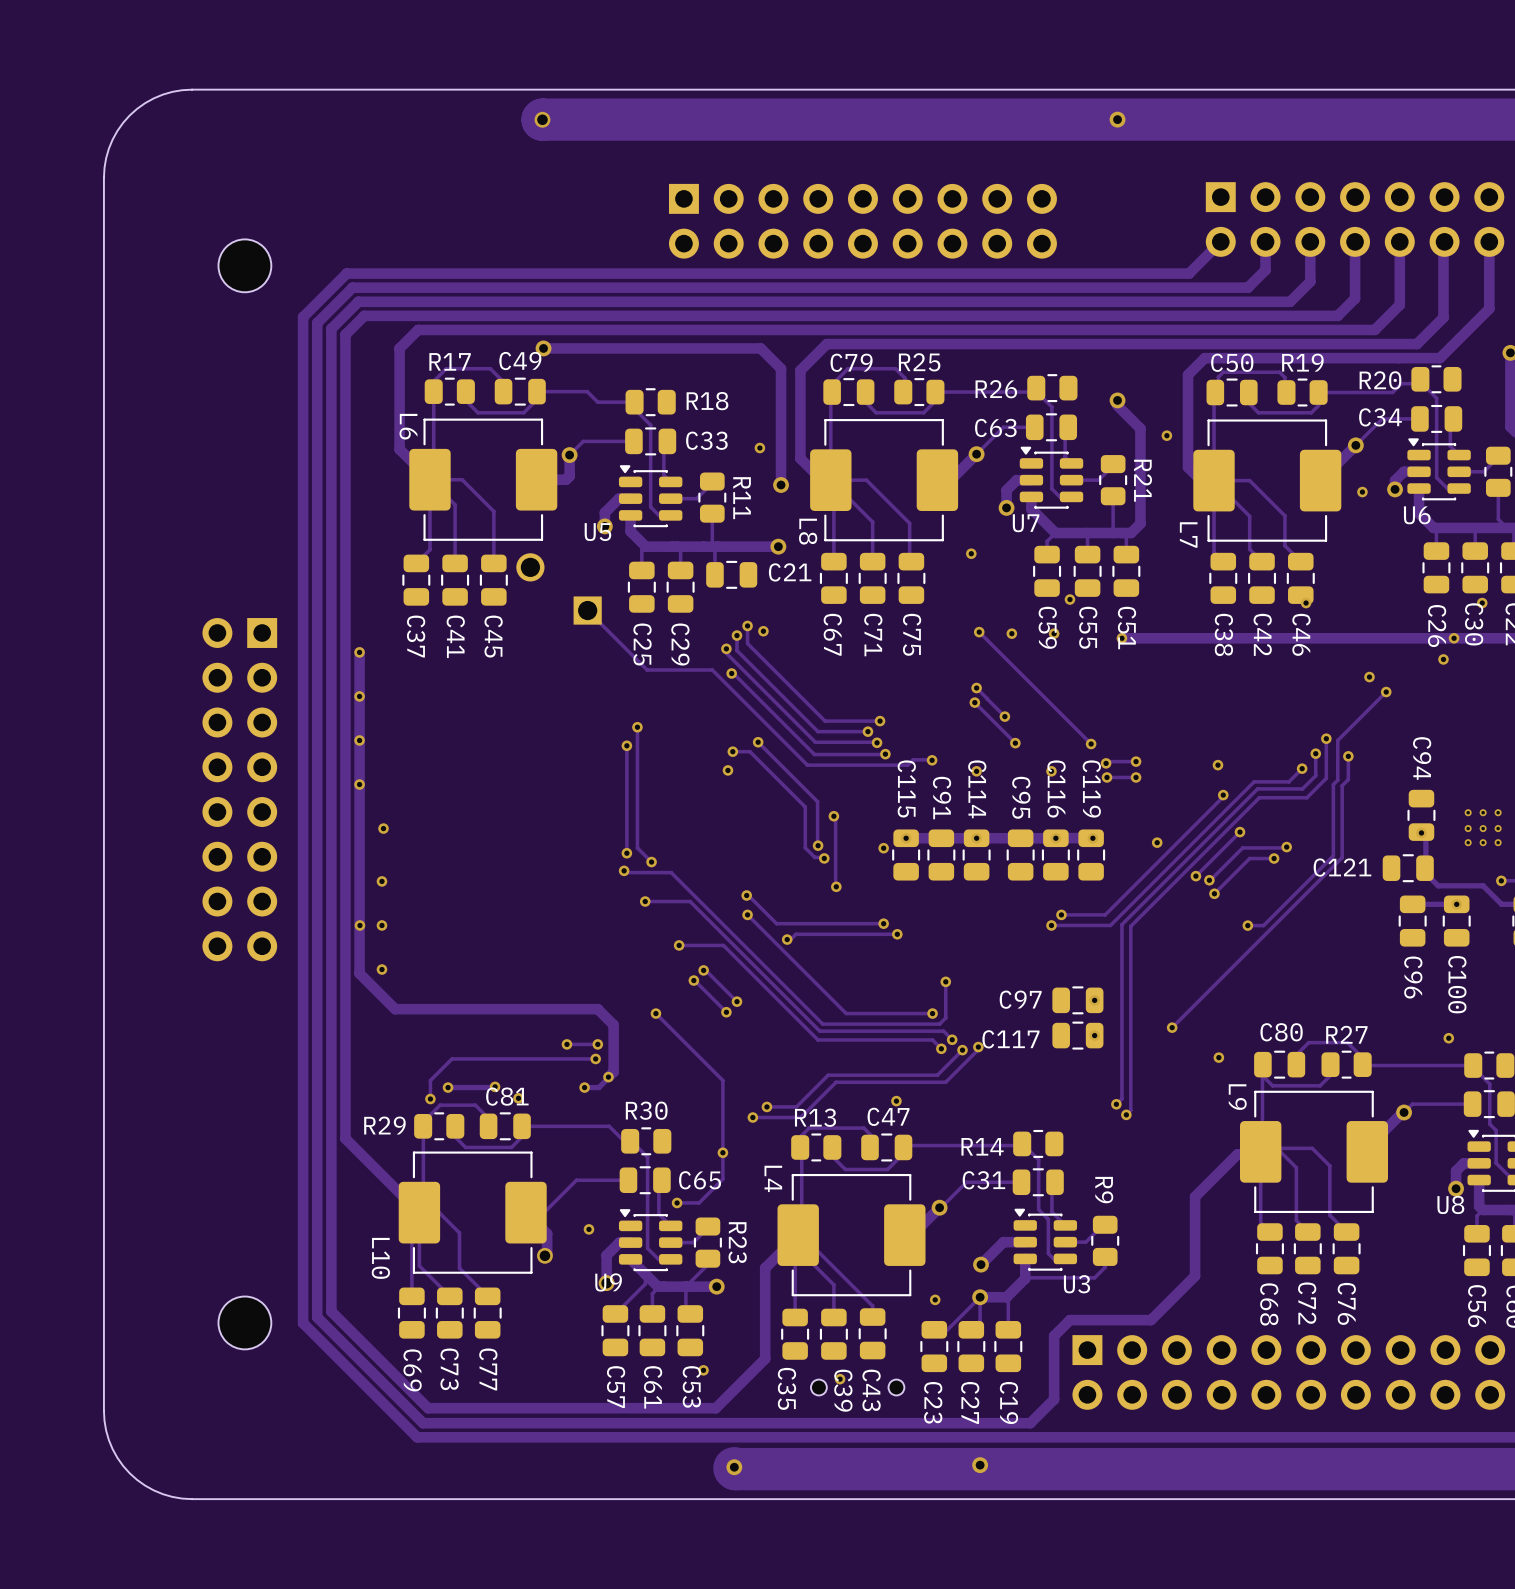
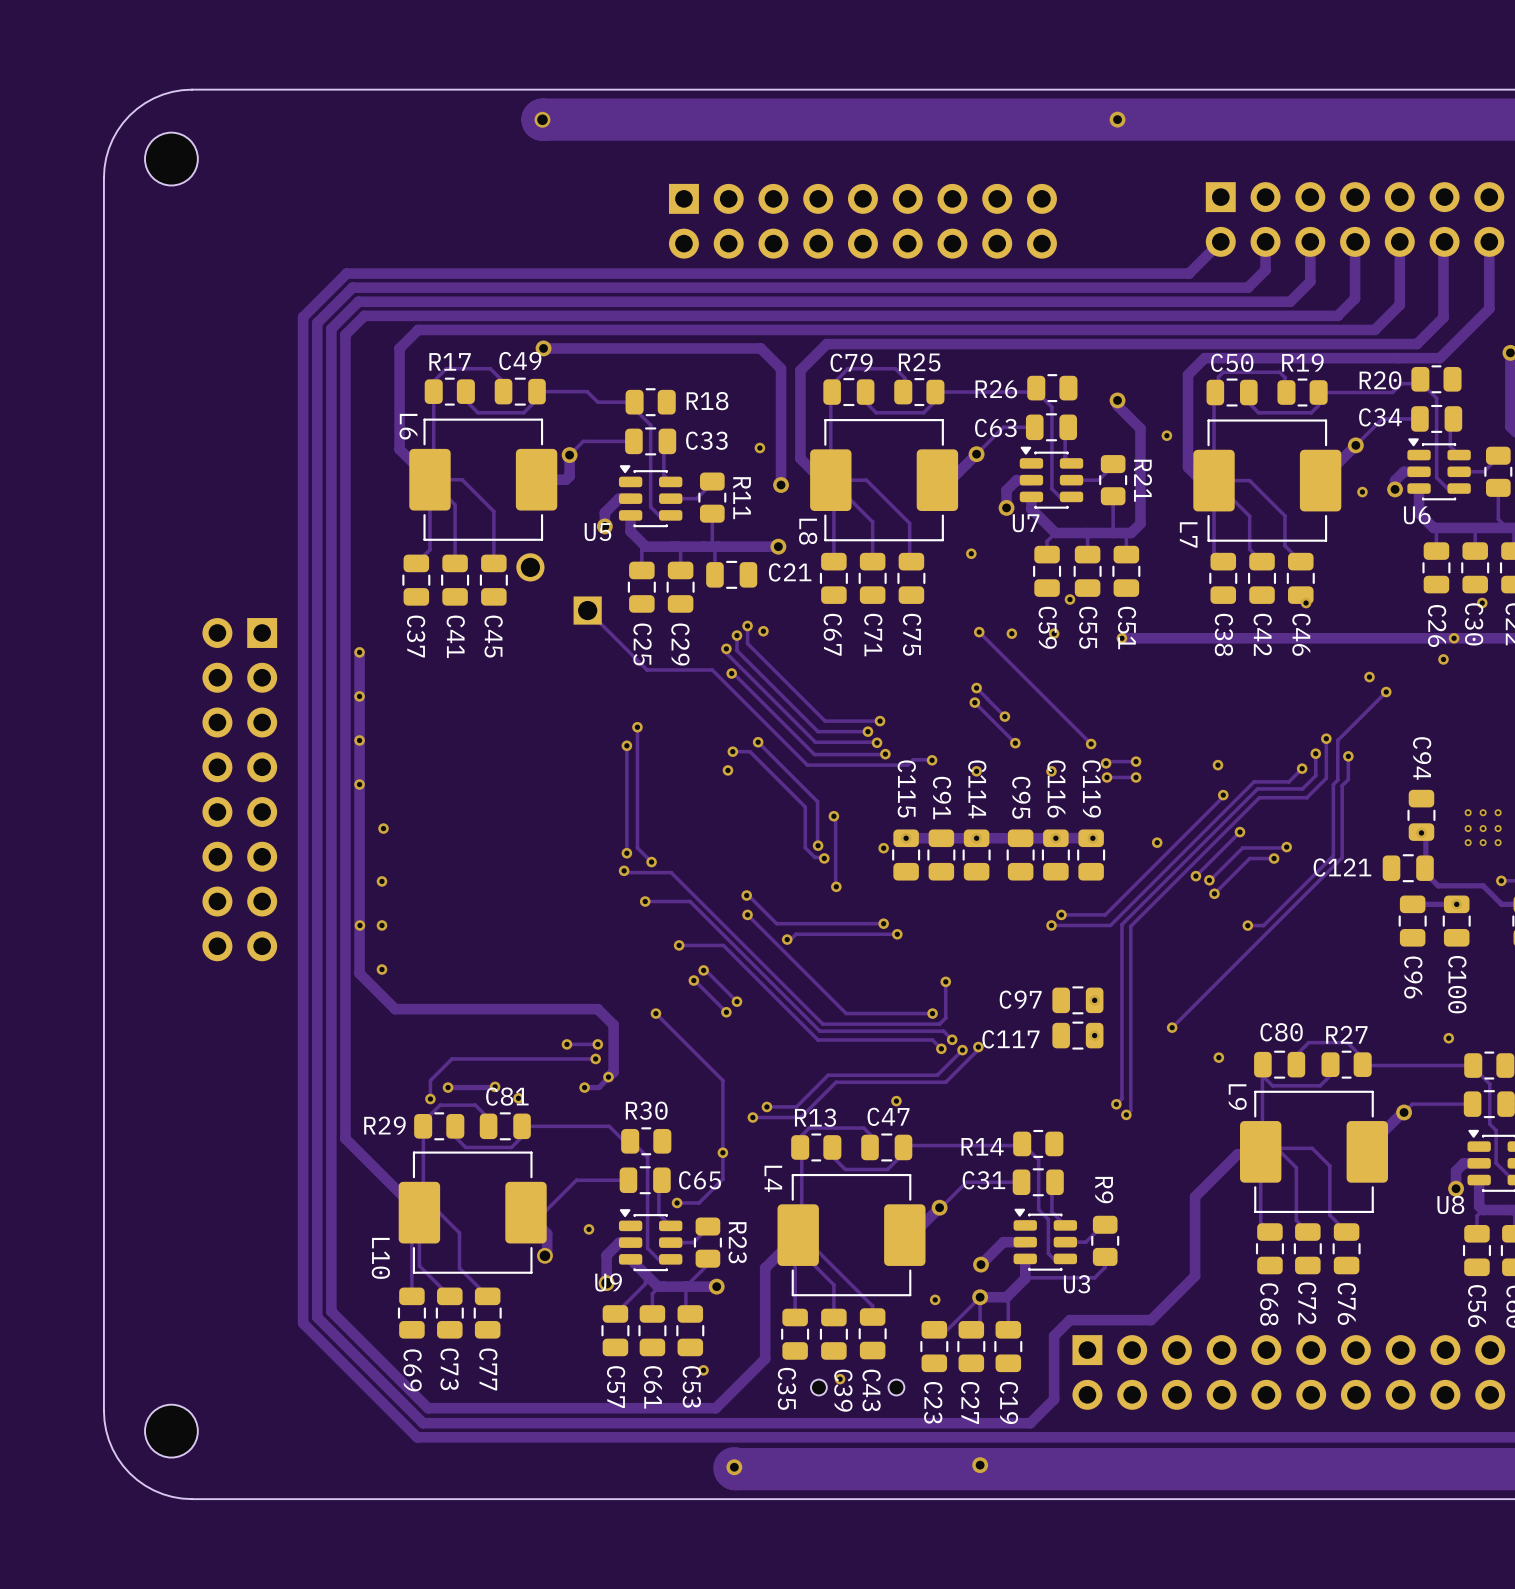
part position: (244, 265) -> (171, 159)
part position: (244, 1322) -> (171, 1431)

